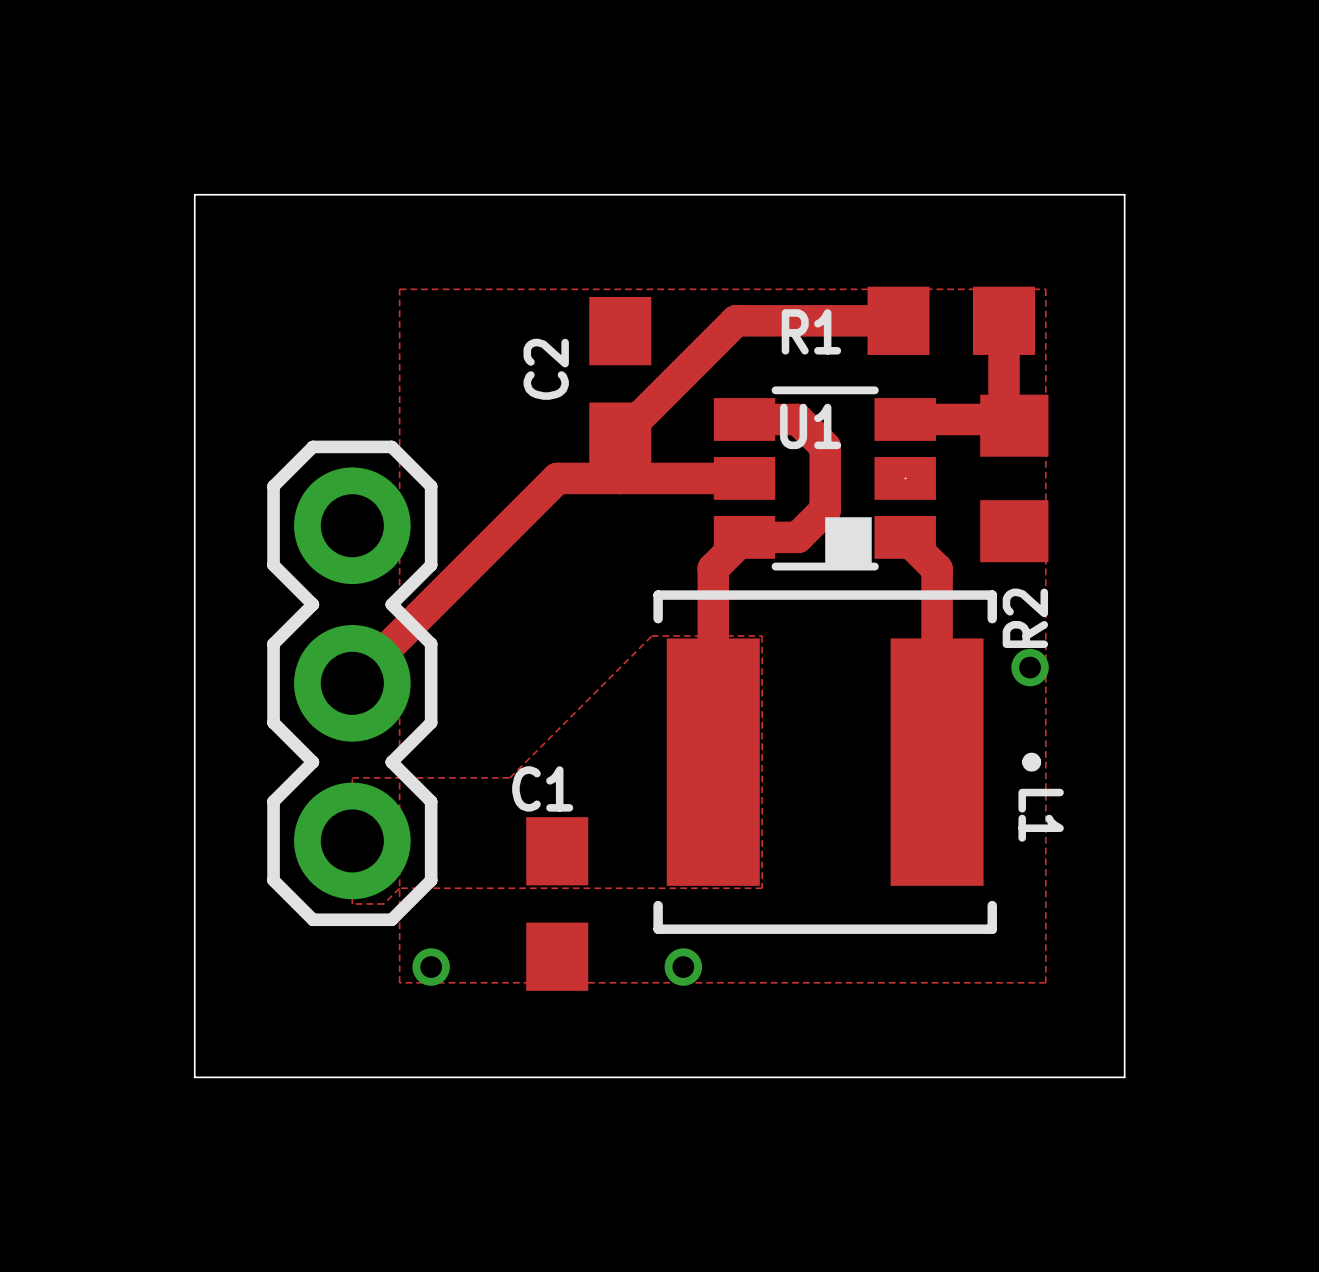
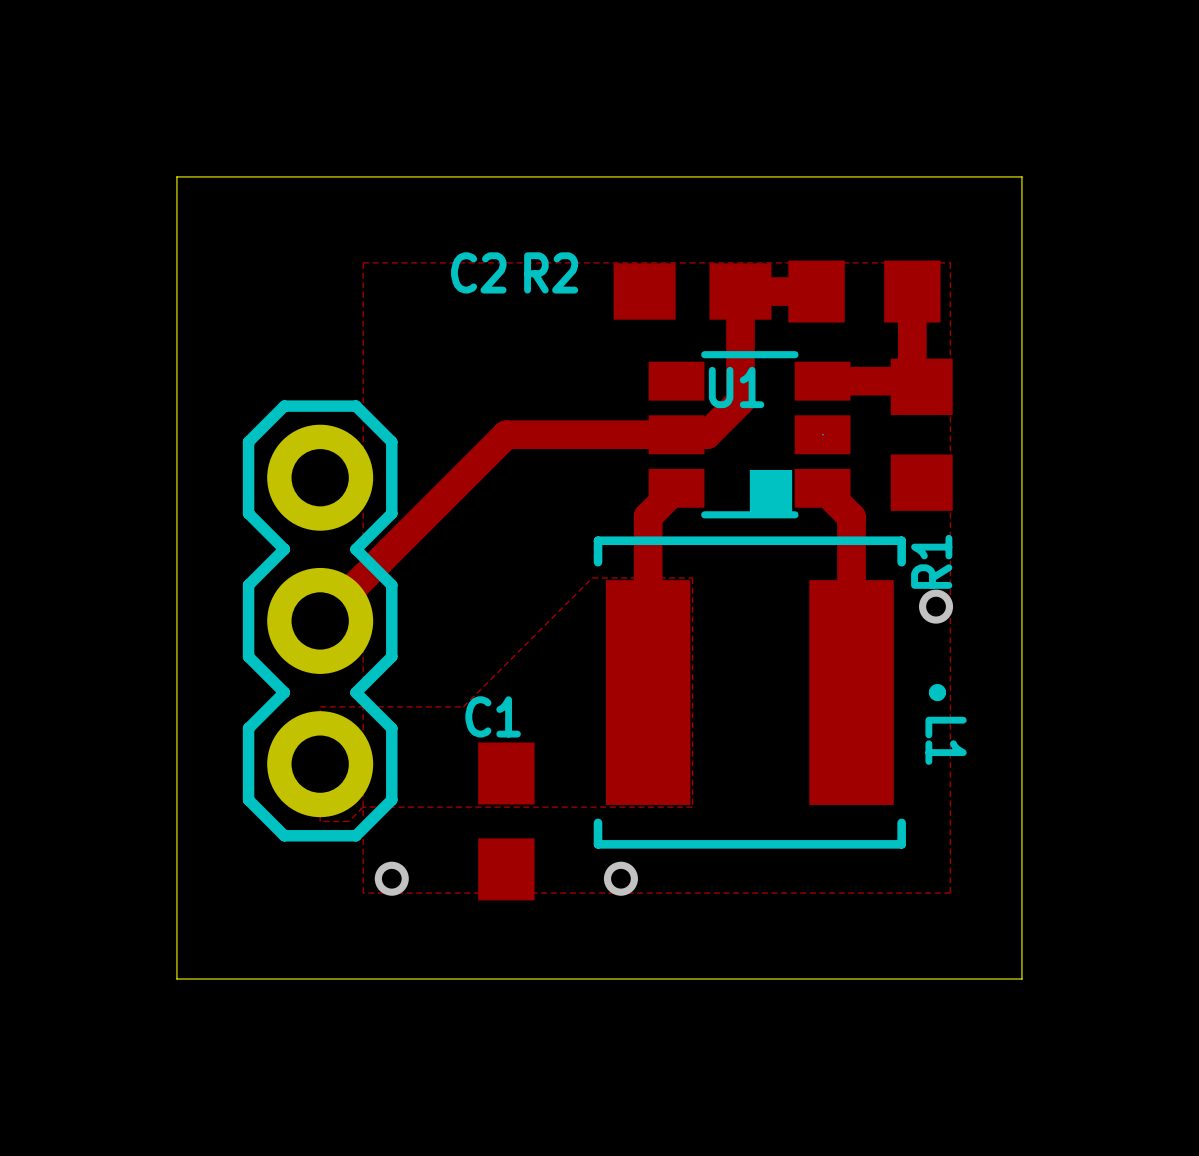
track: (814, 320) (736, 320) (620, 436) (620, 478) -> (740, 291) (740, 401) (706, 434) (676, 434)
R1 name: R1 (811, 331) -> R2 (551, 272)
C2 name position: C2 (546, 369) -> C2 (478, 272)
C2 rotation: 0° (620, 383) -> 90° clockwise (692, 291)
C2 position: (620, 383) -> (692, 291)
track: (744, 419) (797, 419) (825, 446) (825, 509) (797, 537) (744, 537) -> none
R2 name: R2 (1025, 618) -> R1 (931, 561)

